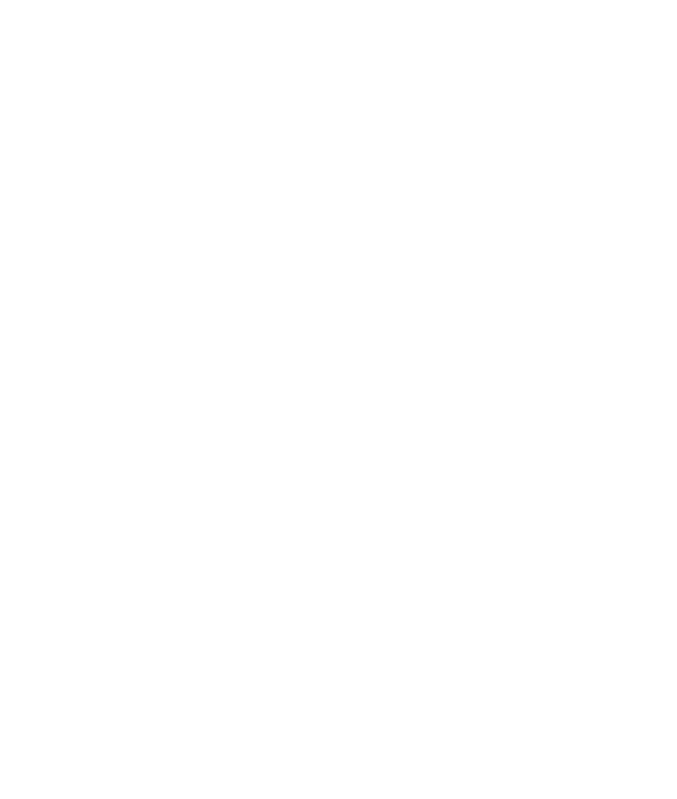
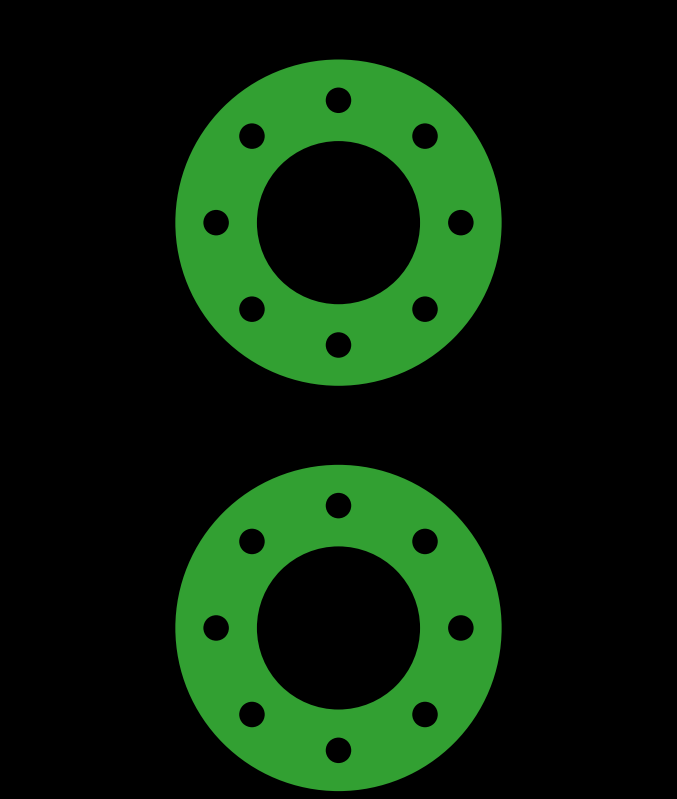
part: none -> (338, 222)
part: none -> (338, 627)

